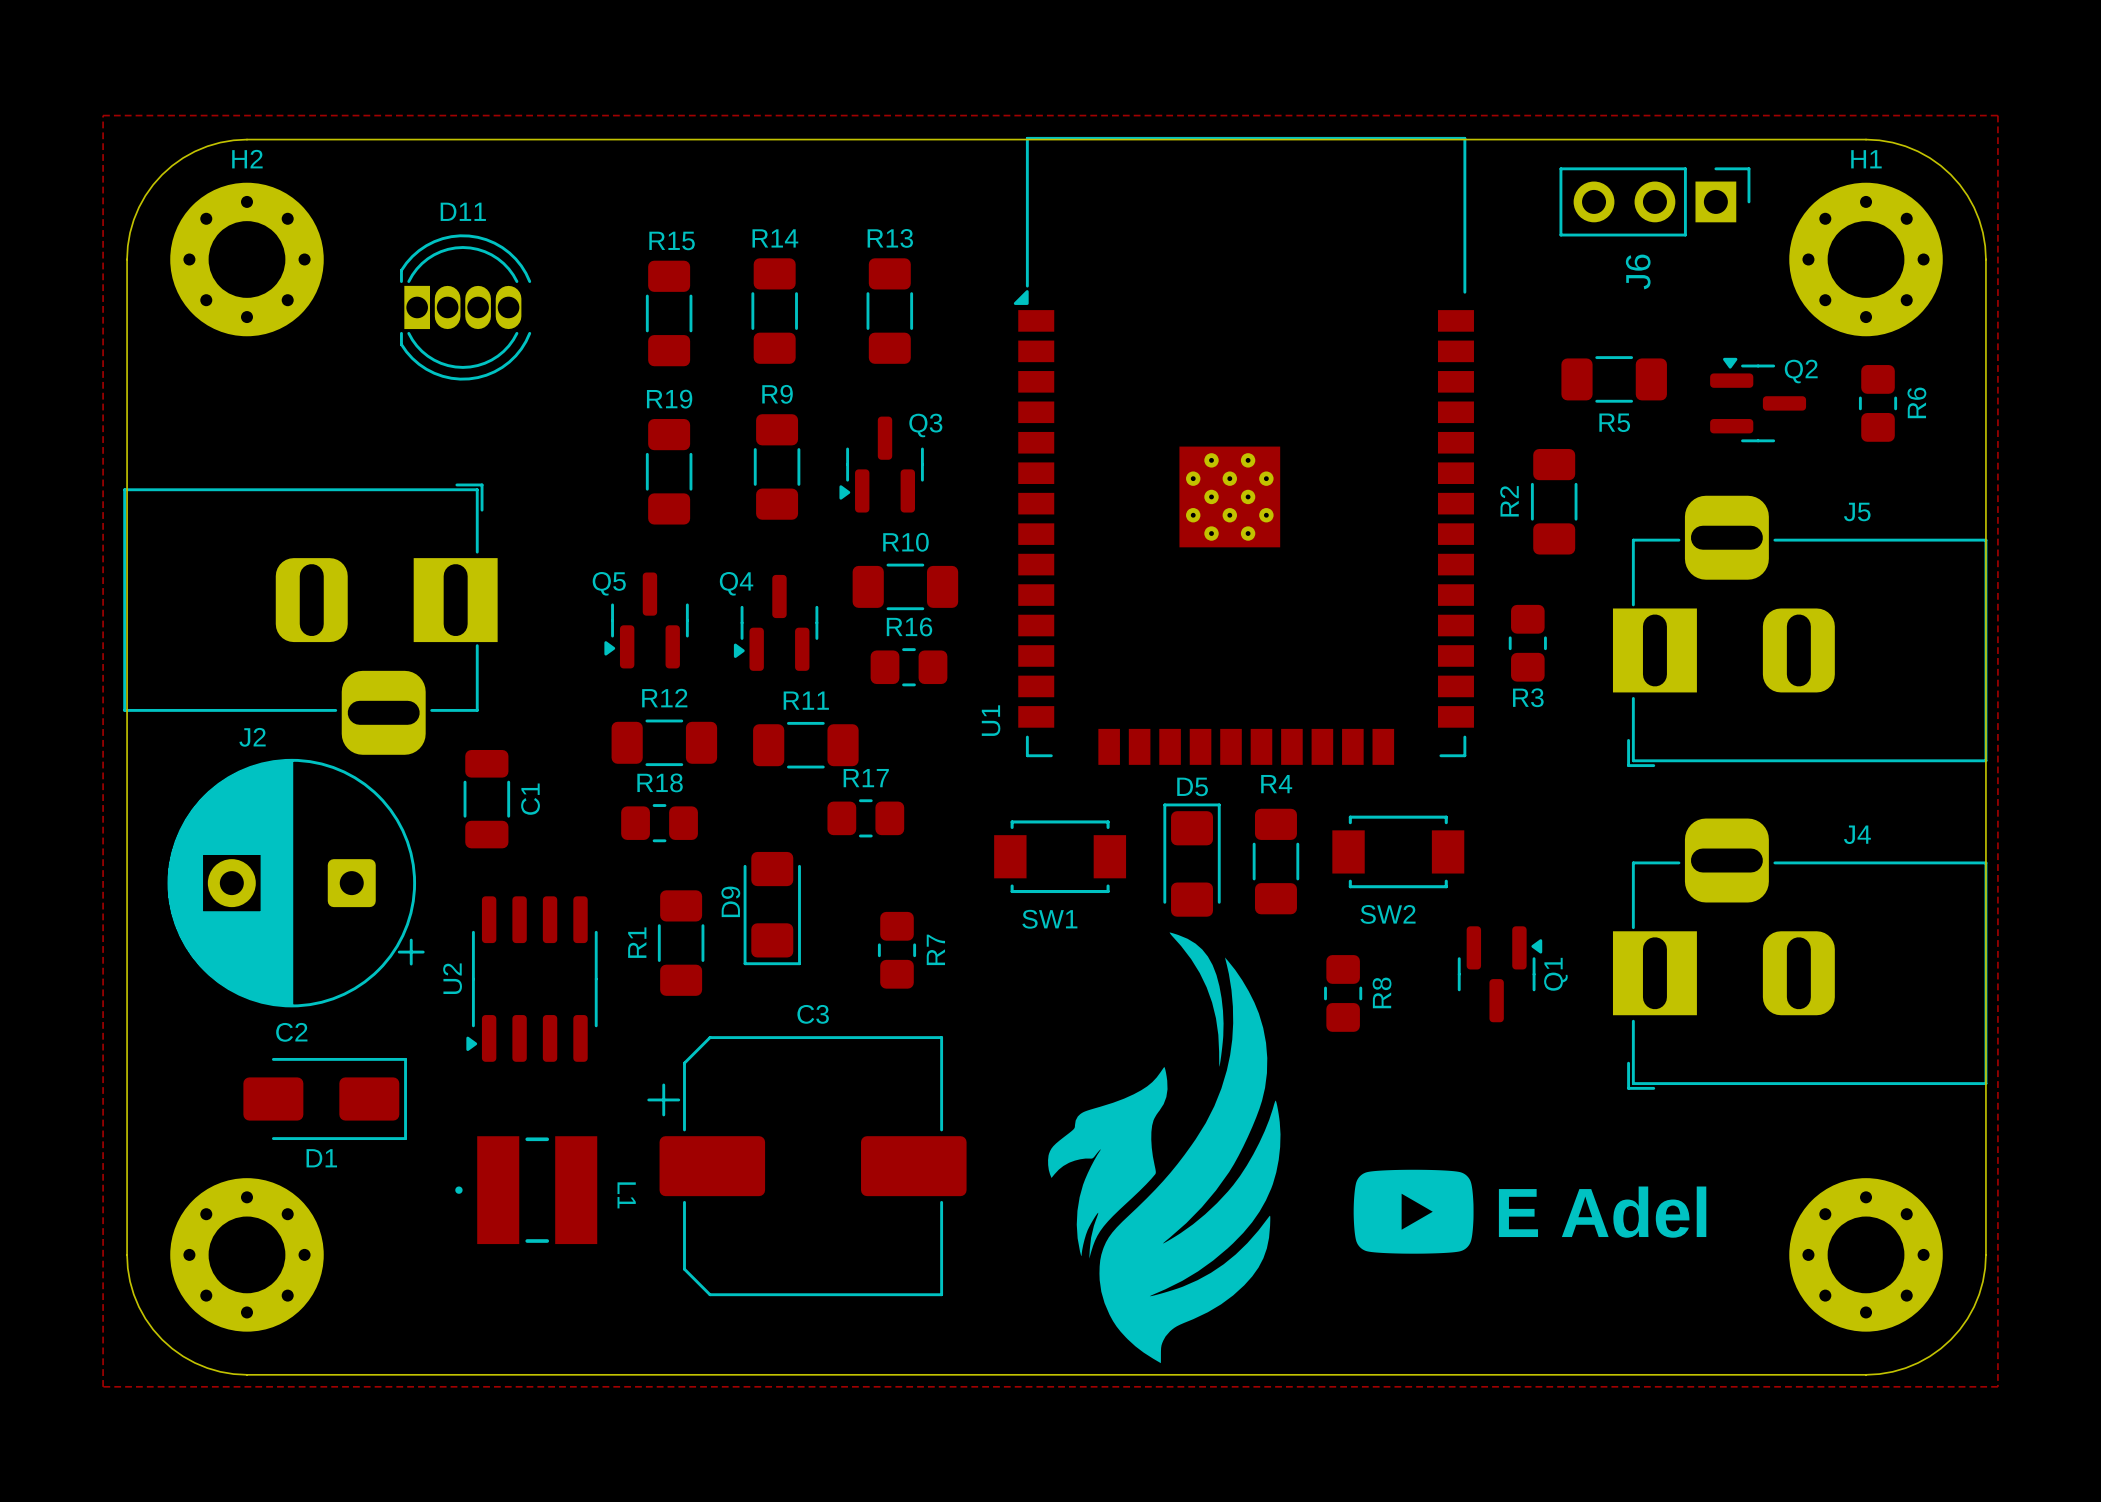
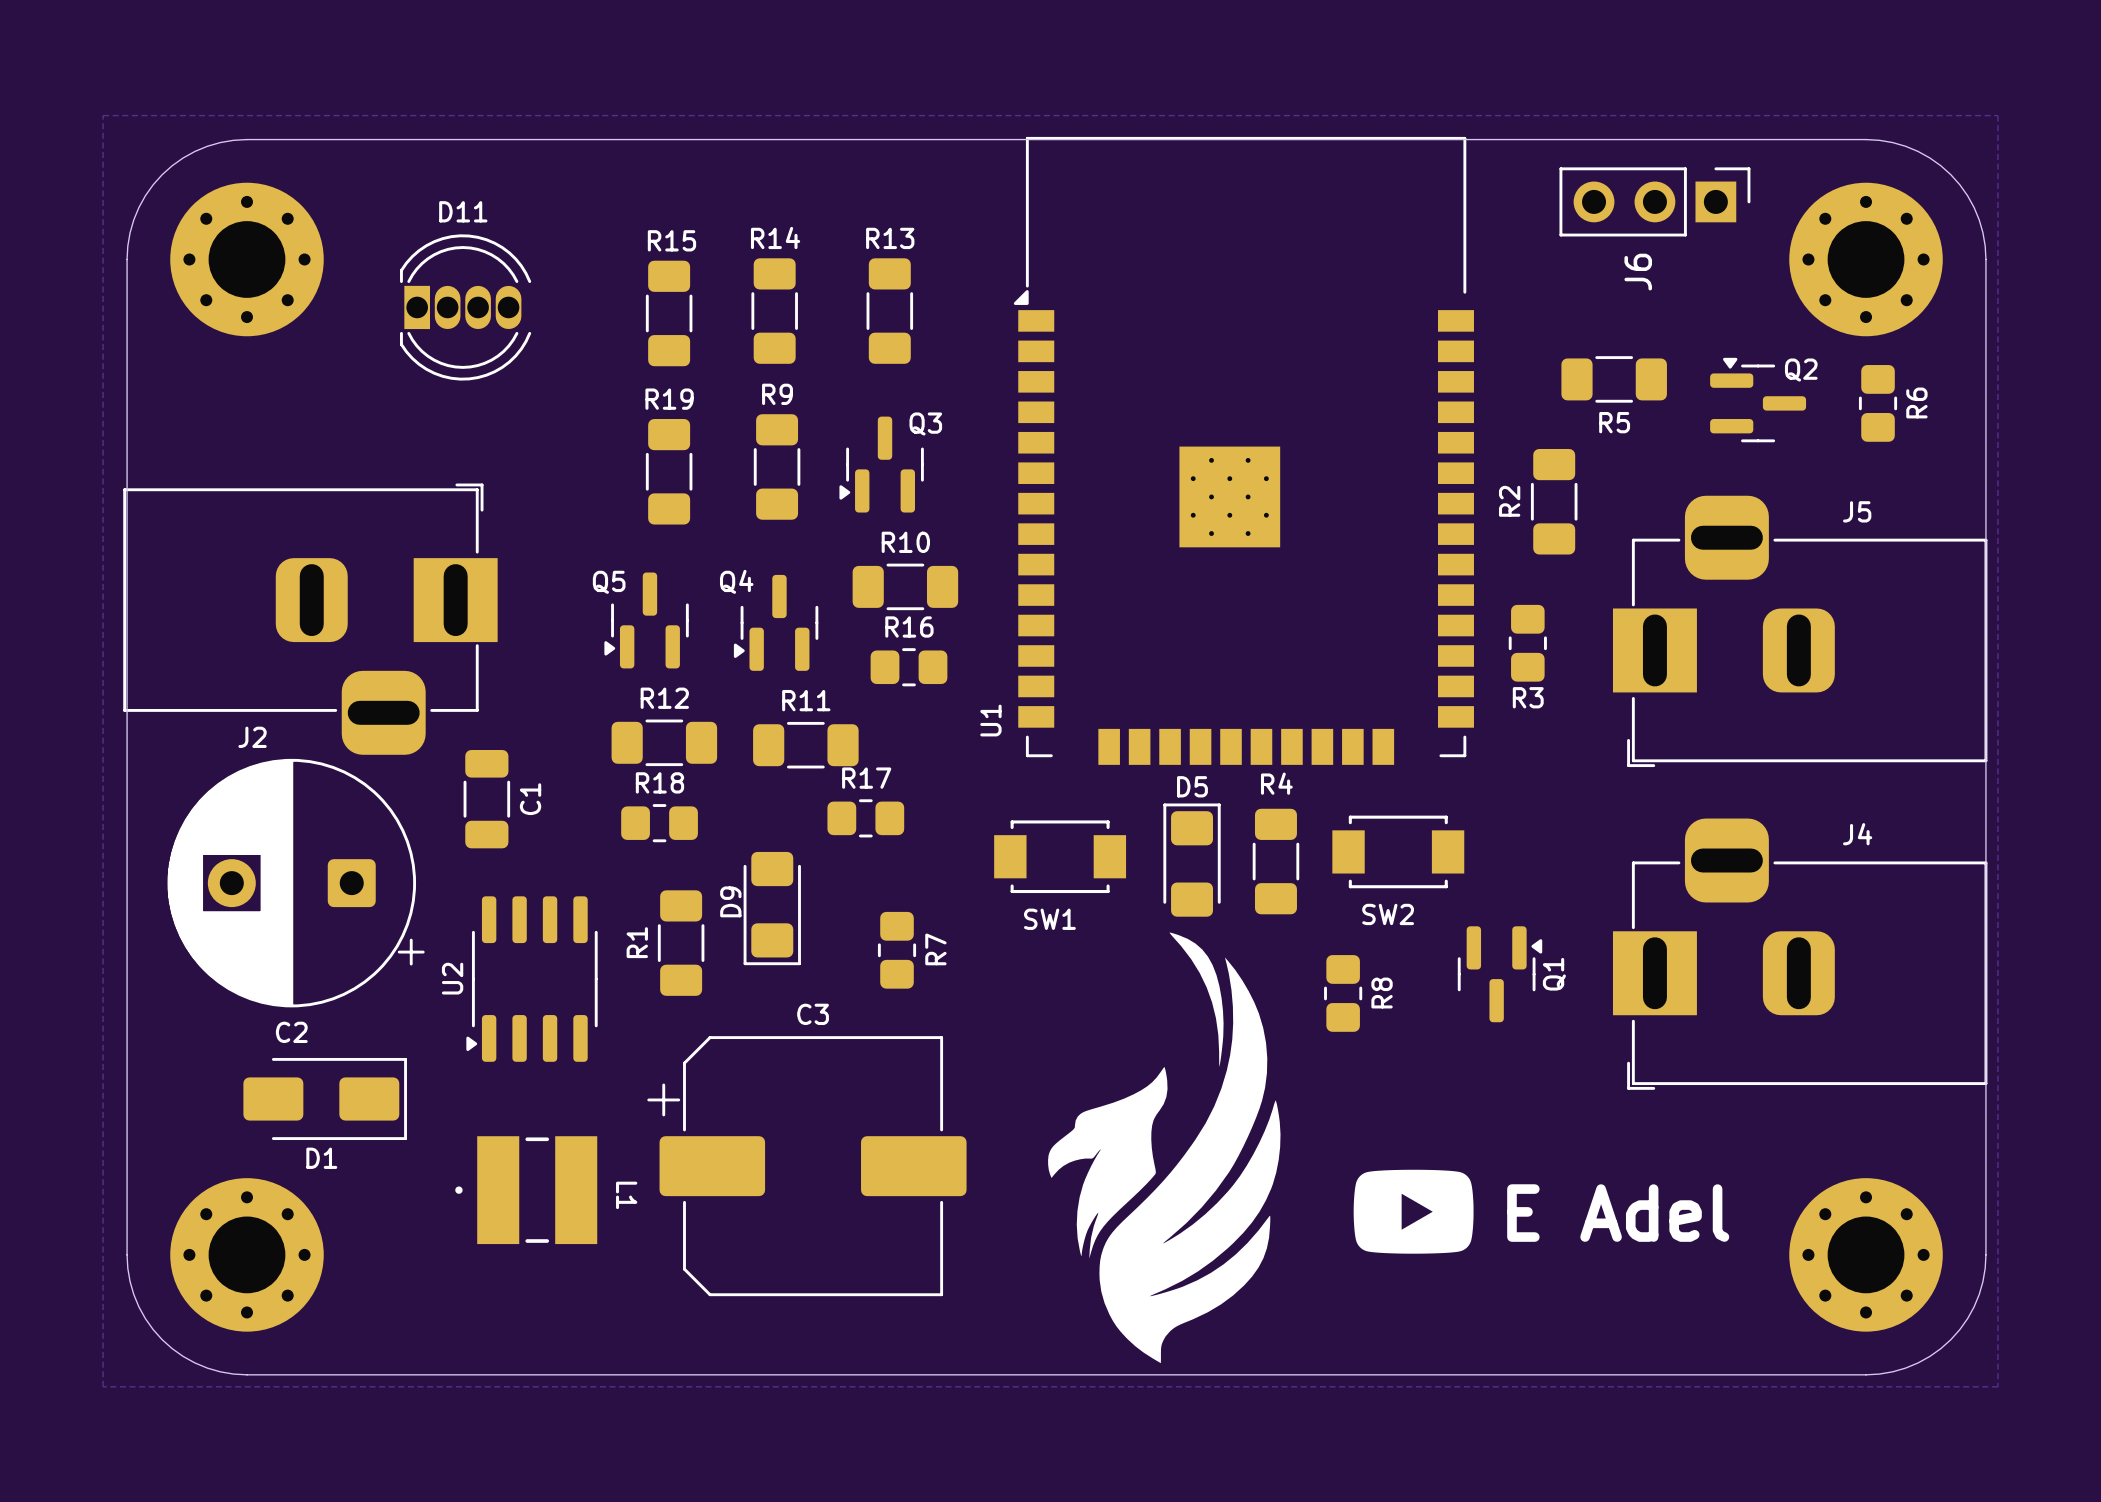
H2 name: H2 (247, 159) -> none
H1 name: H1 (1866, 159) -> none

